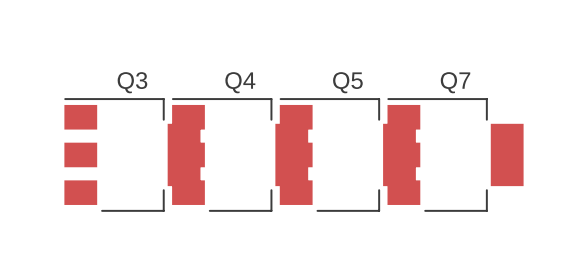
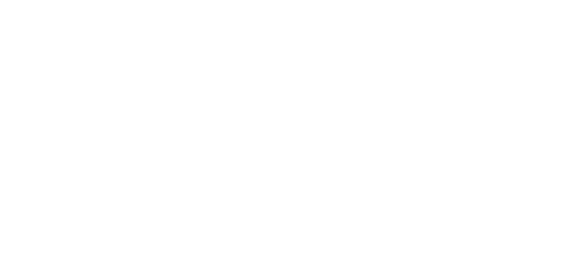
Q3: (132, 154) -> none
Q4: (240, 154) -> none
Q5: (347, 154) -> none
Q7: (455, 154) -> none

